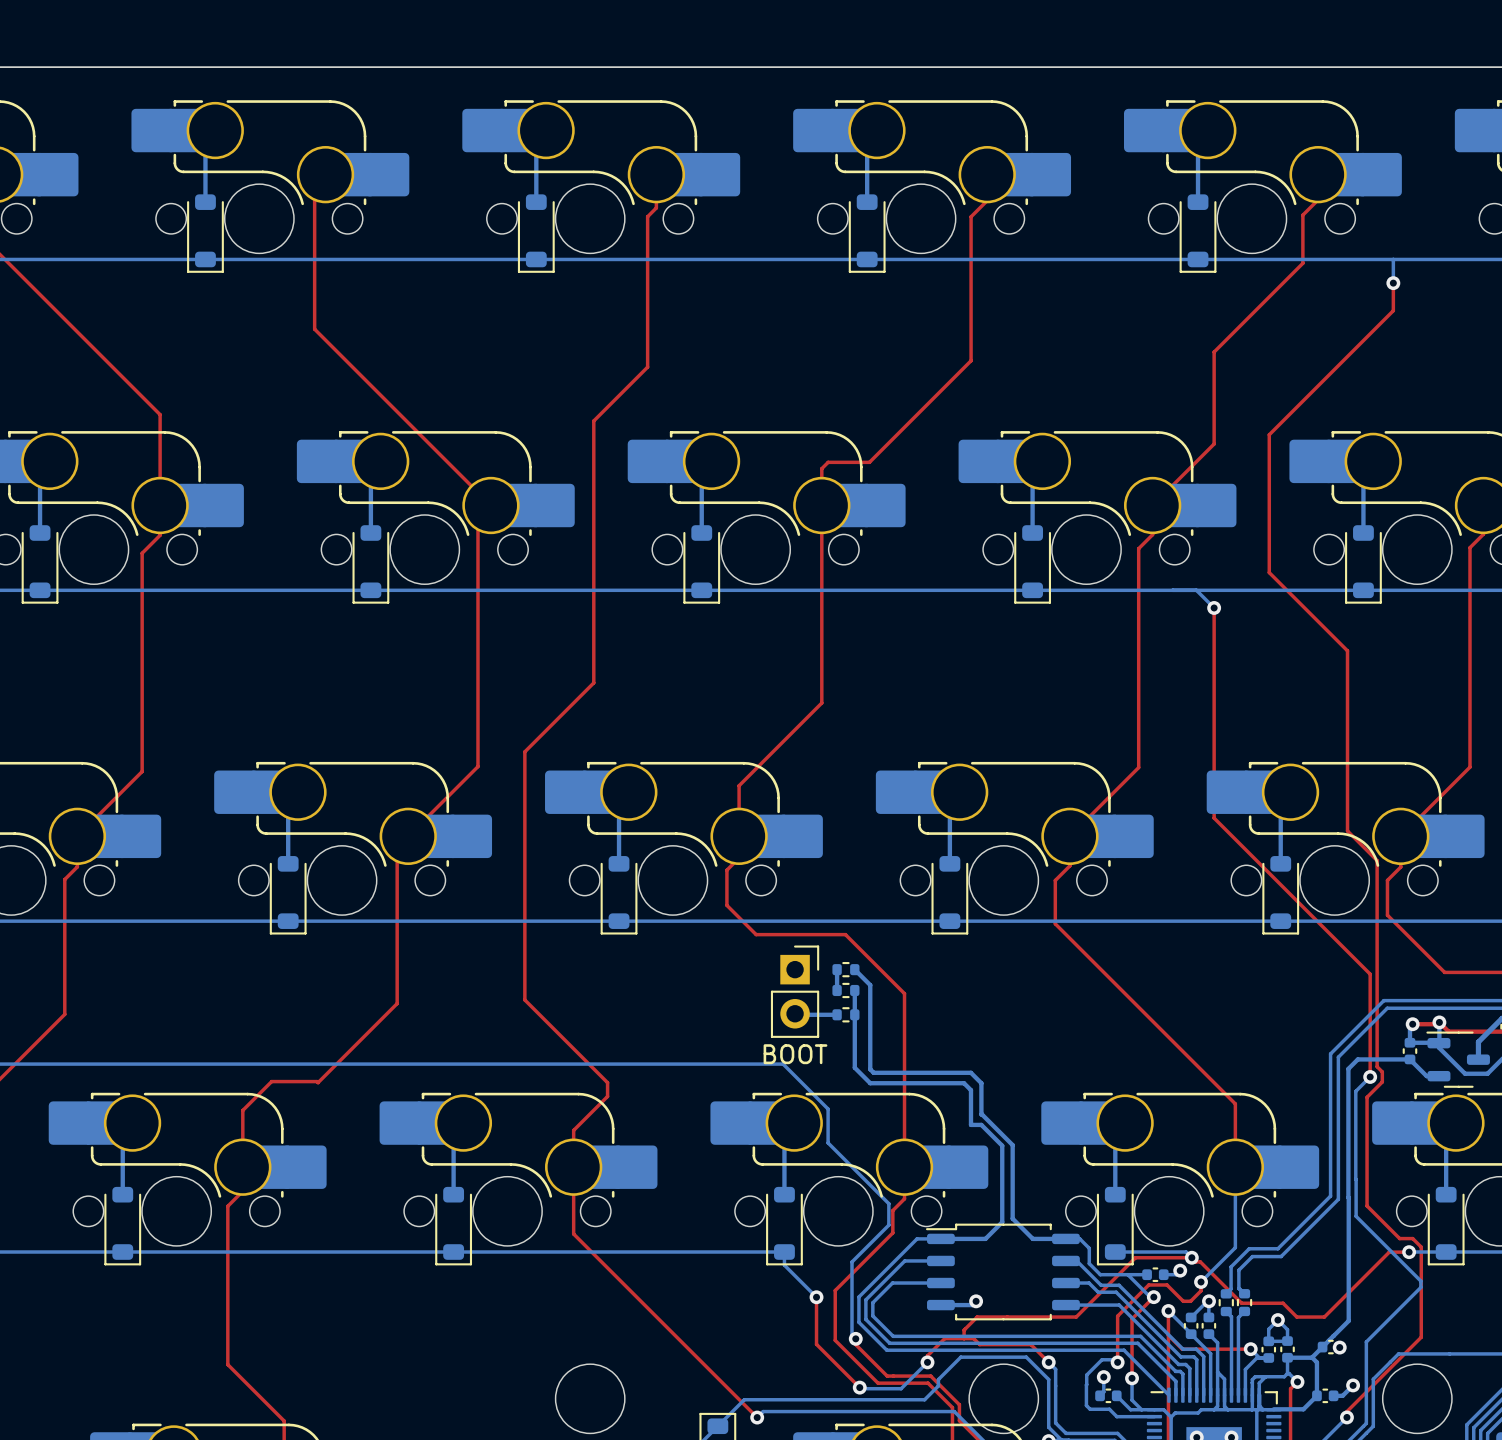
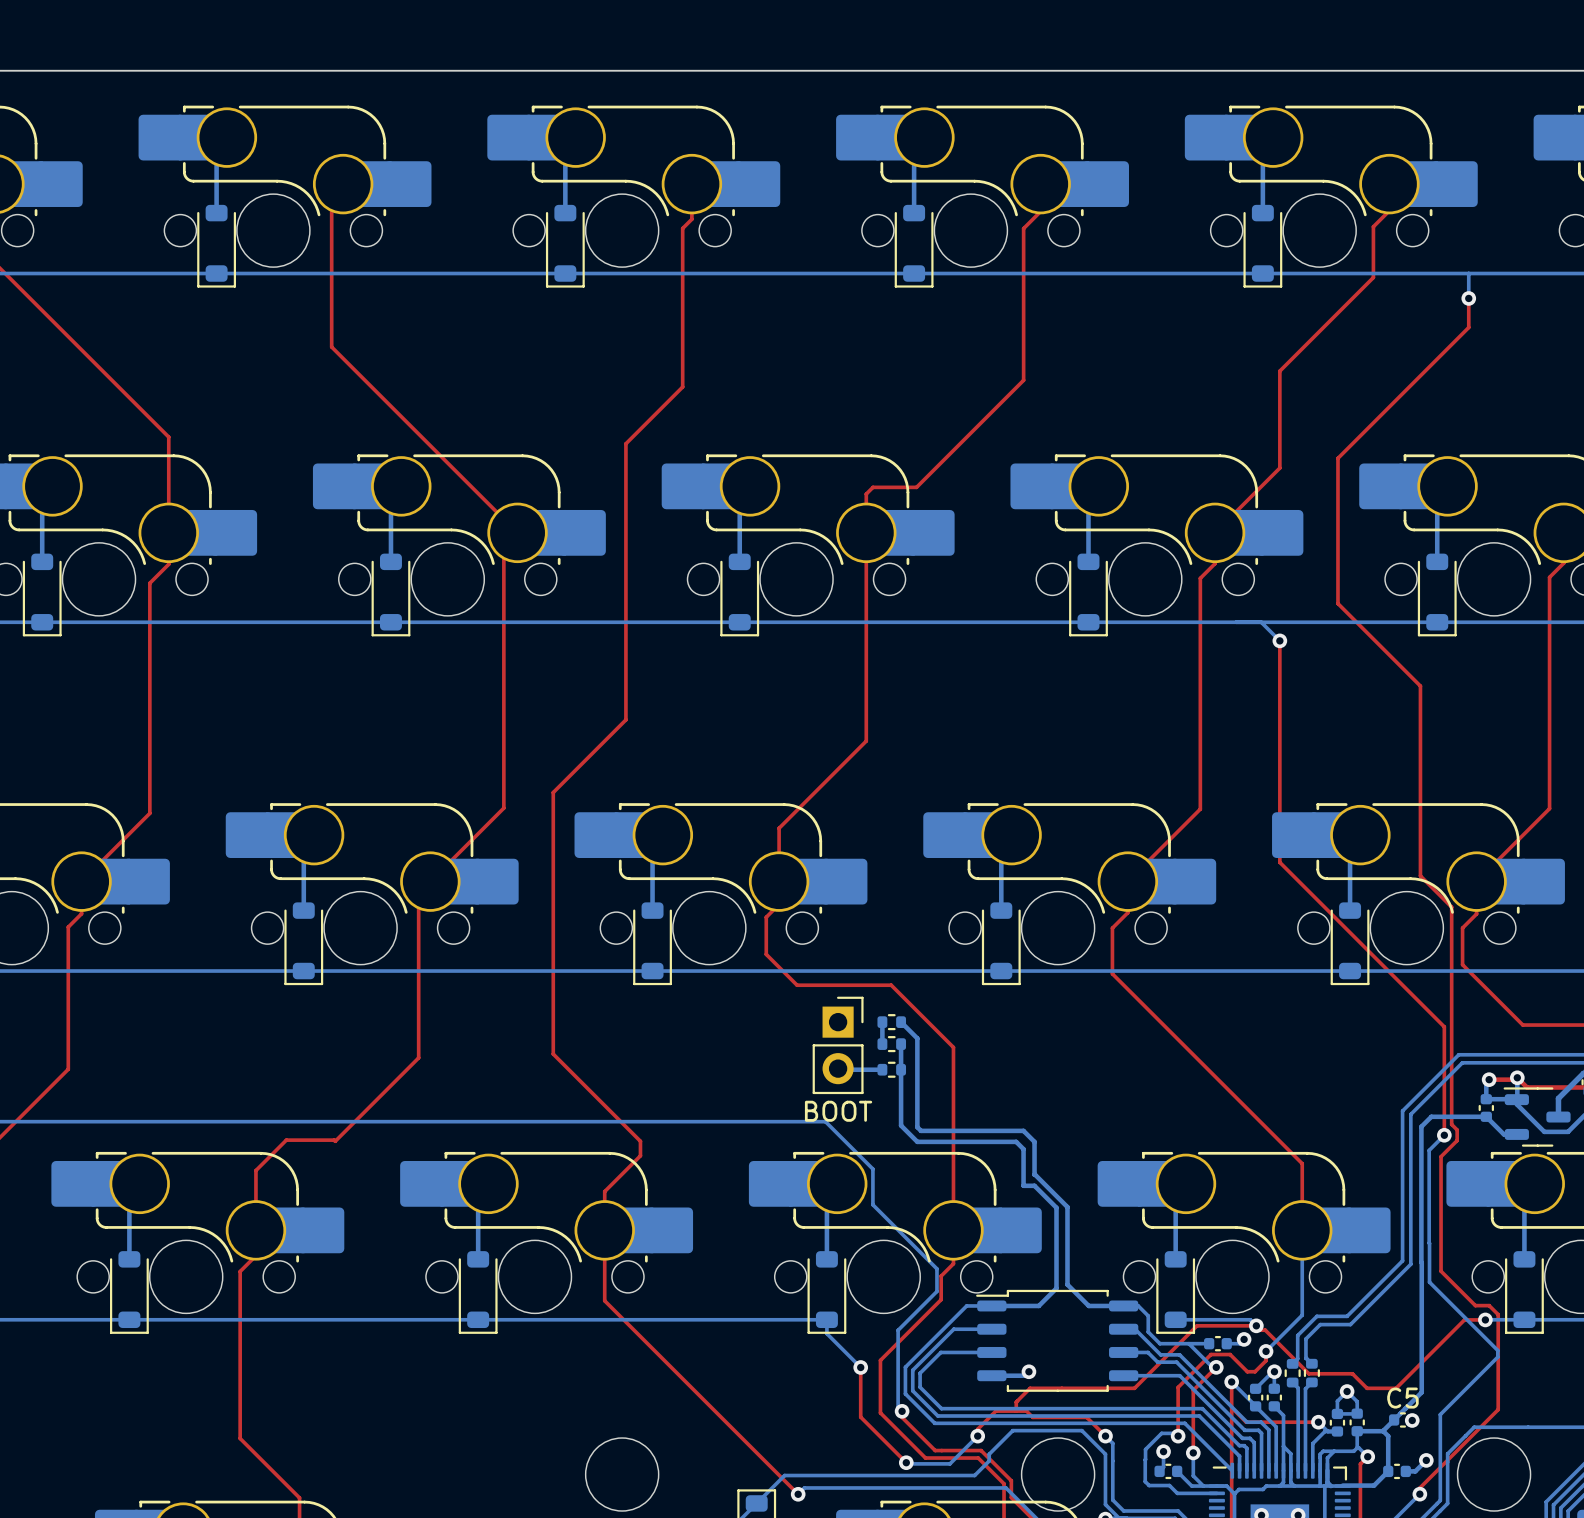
C5 name: none -> C5 (1402, 1398)

